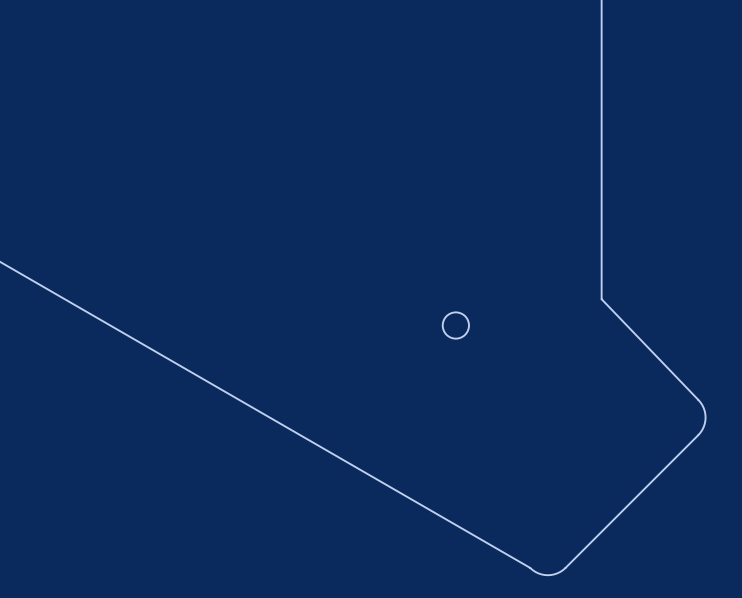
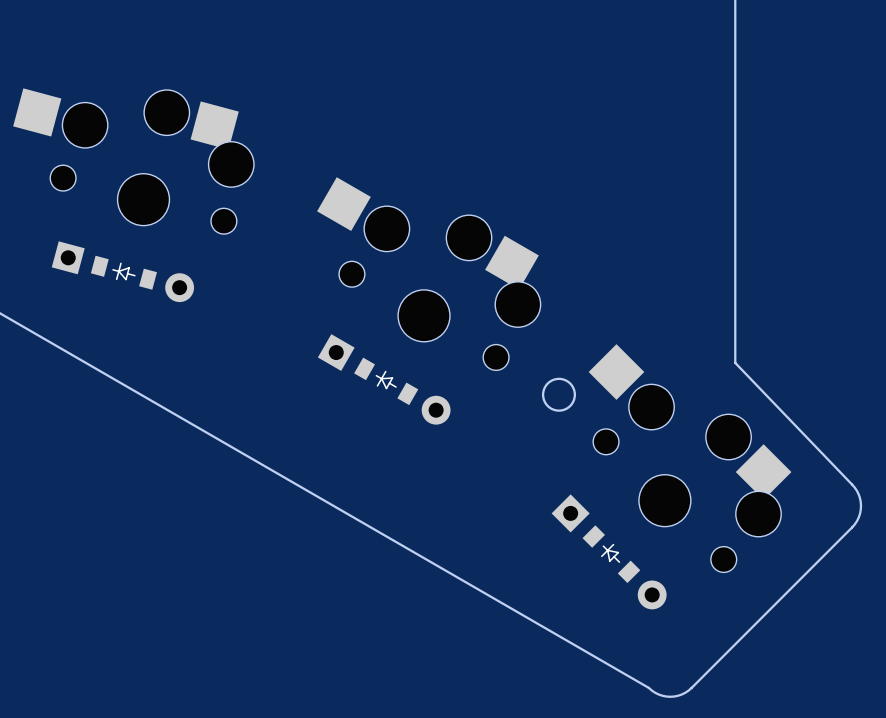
part: none -> (133, 161)
part: none -> (122, 271)
part: none -> (428, 273)
part: none -> (384, 379)
part: none -> (690, 458)
part: none -> (609, 551)

